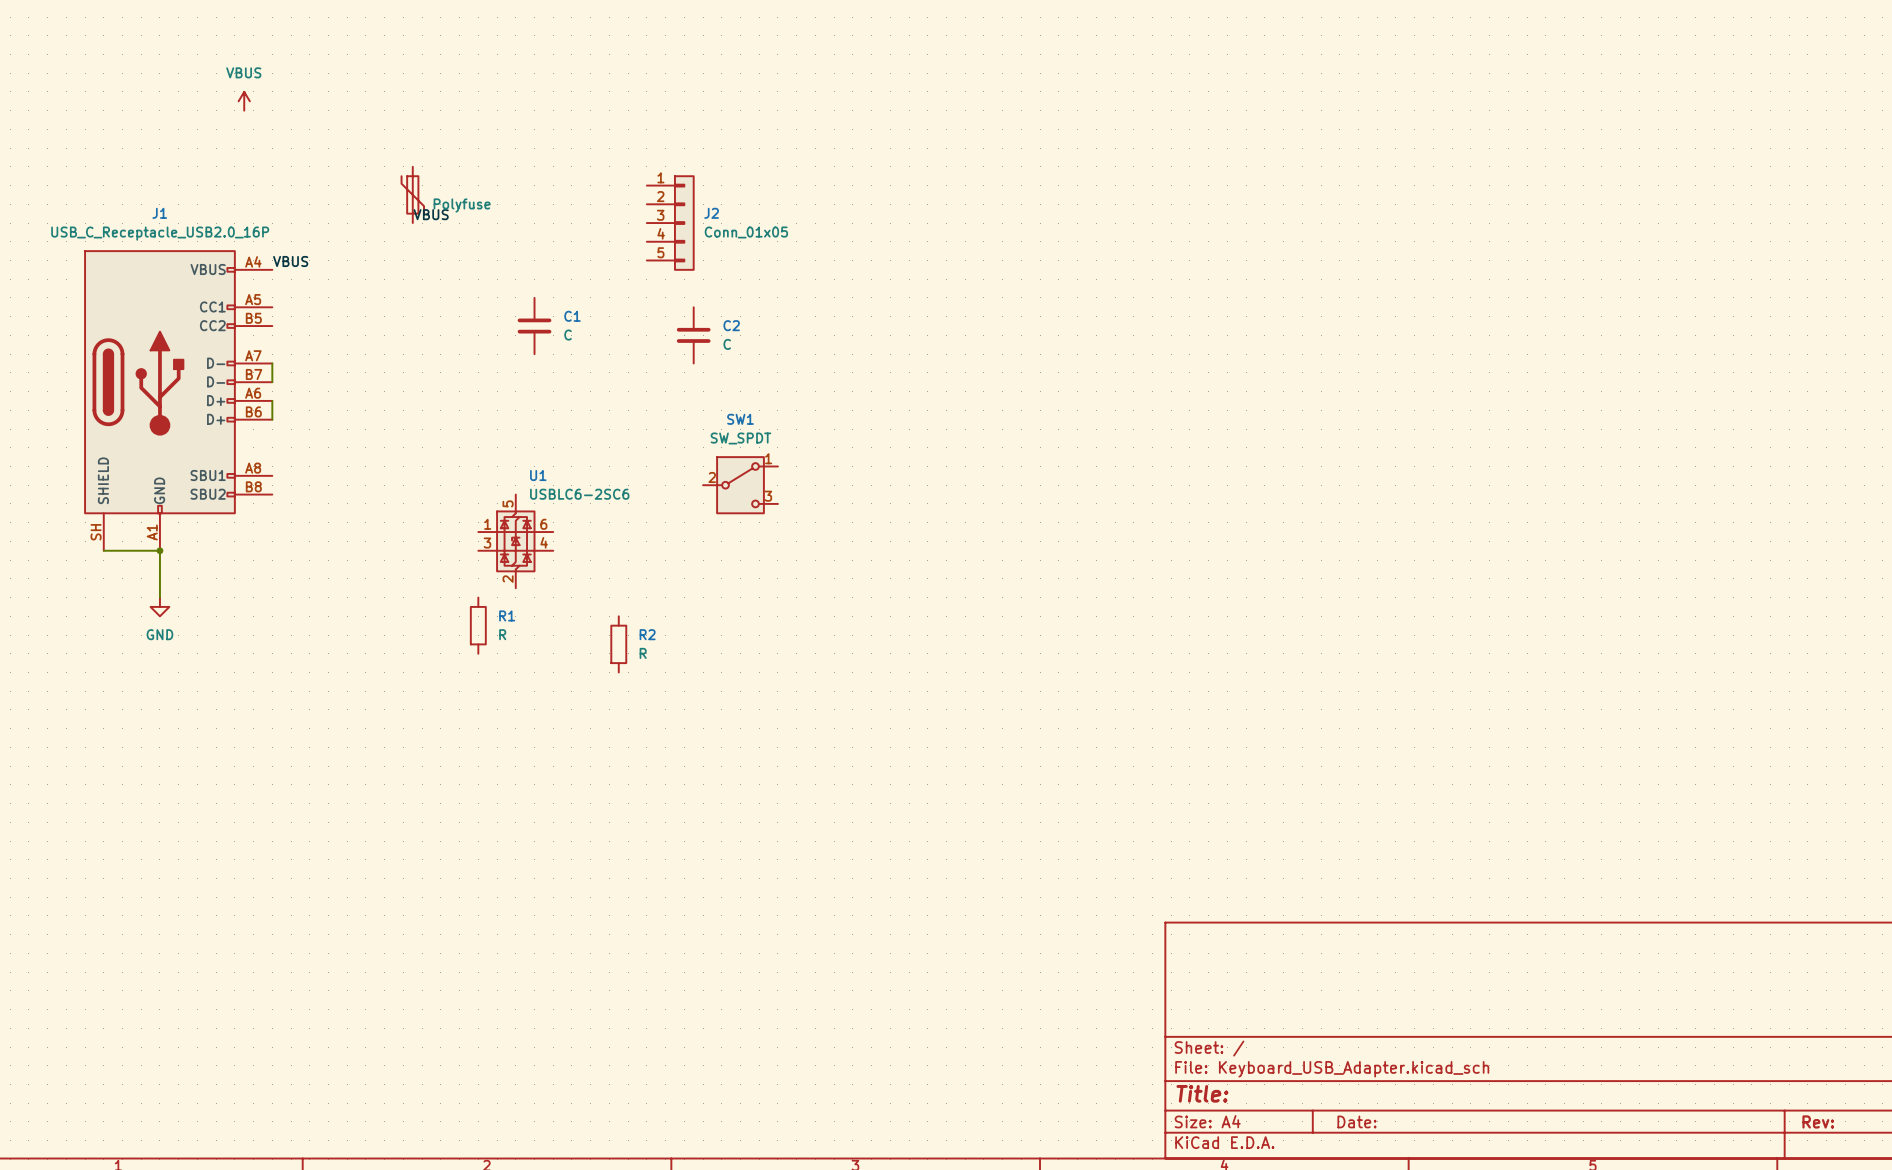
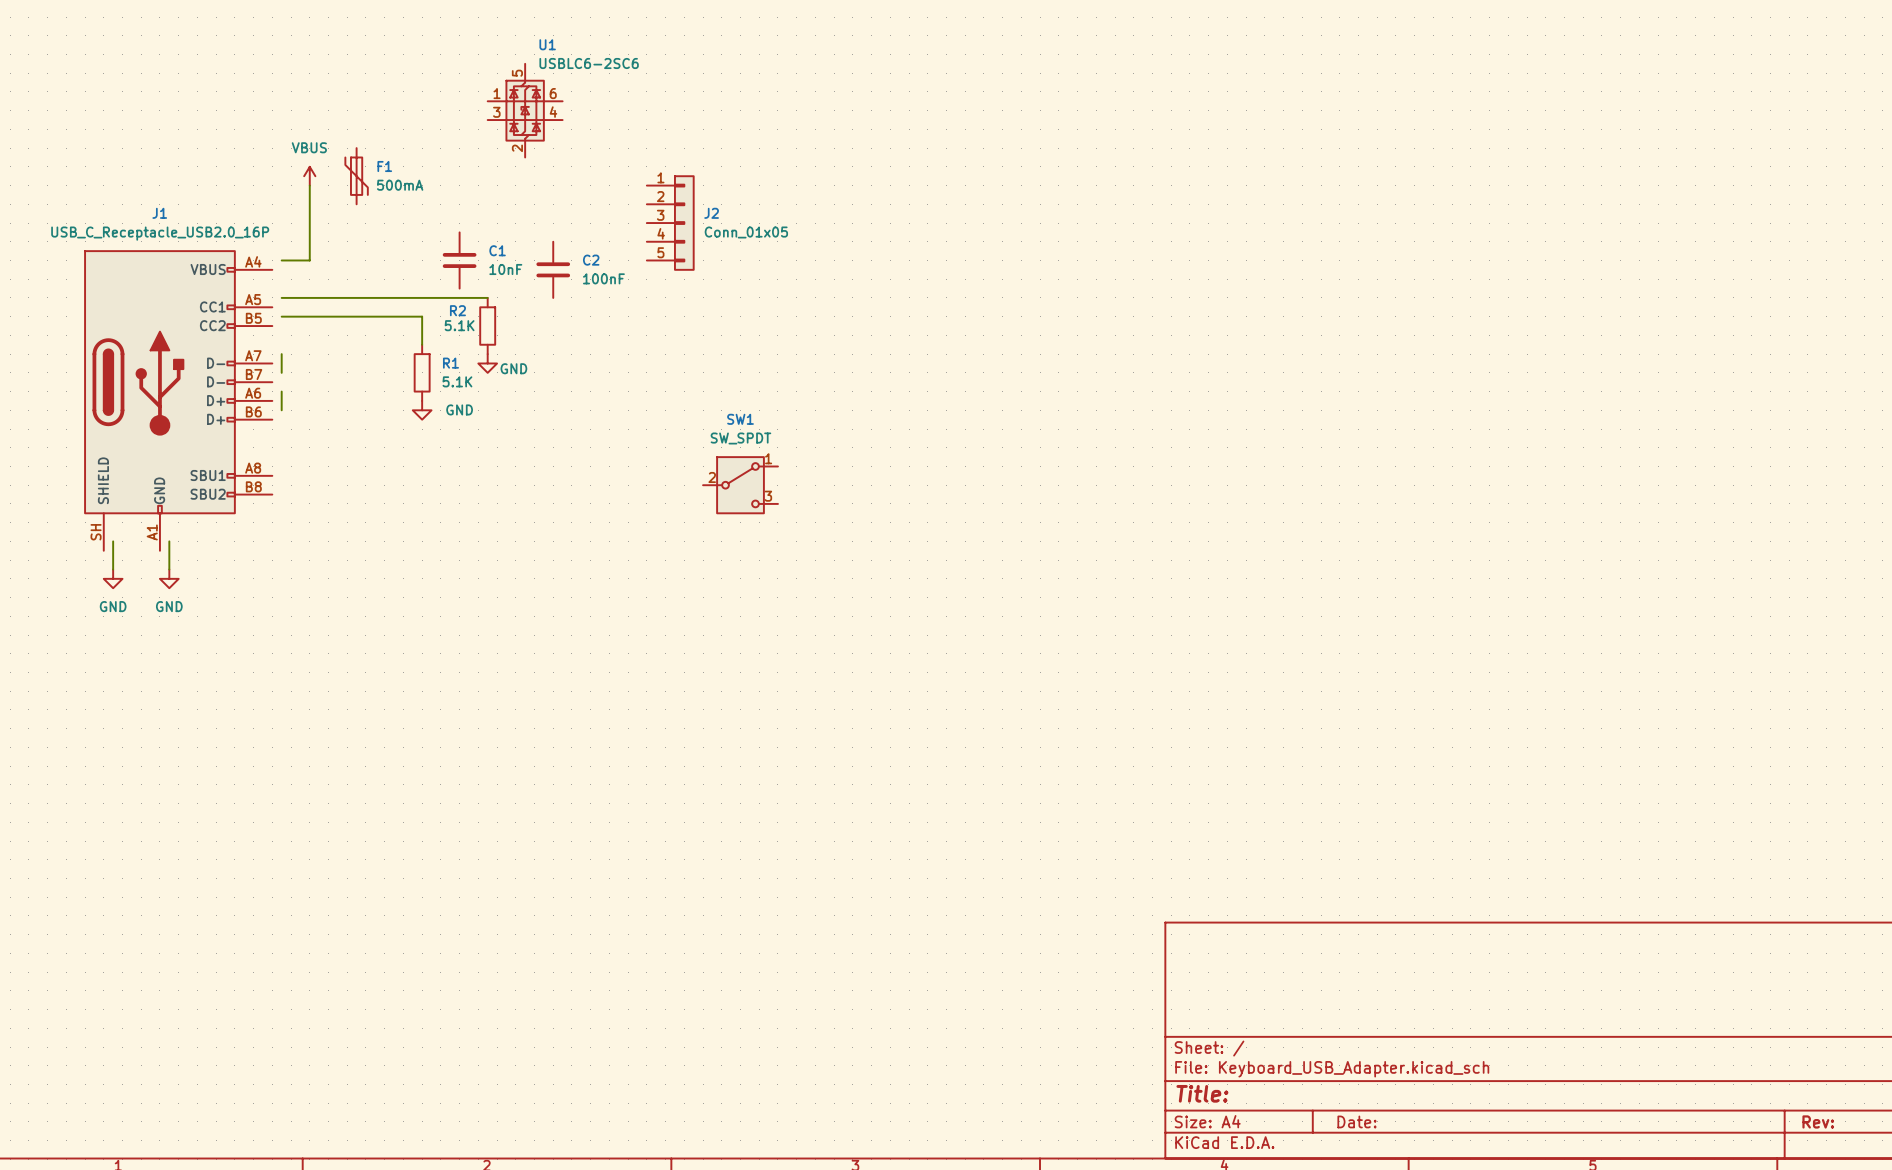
power symbol position: VBUS (244, 101) -> VBUS (309, 176)
F1: none -> 500mA (356, 176)
wire: none -> (309, 185) (309, 260) (281, 260)
part: Polyfuse (412, 194) -> none
label: VBUS (431, 214) -> none
label: VBUS (290, 261) -> none
wire: none -> (281, 297) (487, 297)
wire: none -> (281, 316) (422, 316) (422, 344)
C1 position: (534, 326) -> (459, 260)
C1 value: C (568, 335) -> 10nF (505, 269)
C2 position: (693, 335) -> (553, 269)
C2 value: C (727, 344) -> 100nF (603, 278)
wire: (272, 363) (272, 382) -> (281, 354) (281, 372)
power symbol: none -> GND (487, 363)
wire: (272, 400) (272, 419) -> (281, 391) (281, 410)
power symbol: none -> GND (422, 410)
wire: none -> (113, 541) (113, 569)
wire: none -> (169, 541) (169, 569)
U1 position: (515, 541) -> (525, 110)
wire: (103, 550) (159, 550) (159, 597) -> none
junction: (159, 550) -> none
power symbol: none -> GND (113, 578)
power symbol: none -> GND (169, 578)
power symbol: GND (159, 606) -> none
R1 position: (478, 625) -> (422, 372)
R1 value: R (502, 634) -> 5.1K (457, 381)
R2 name position: R2 (647, 634) -> R2 (457, 310)
R2 position: (618, 644) -> (487, 326)
R2 value: R (643, 653) -> 5.1K (459, 325)

